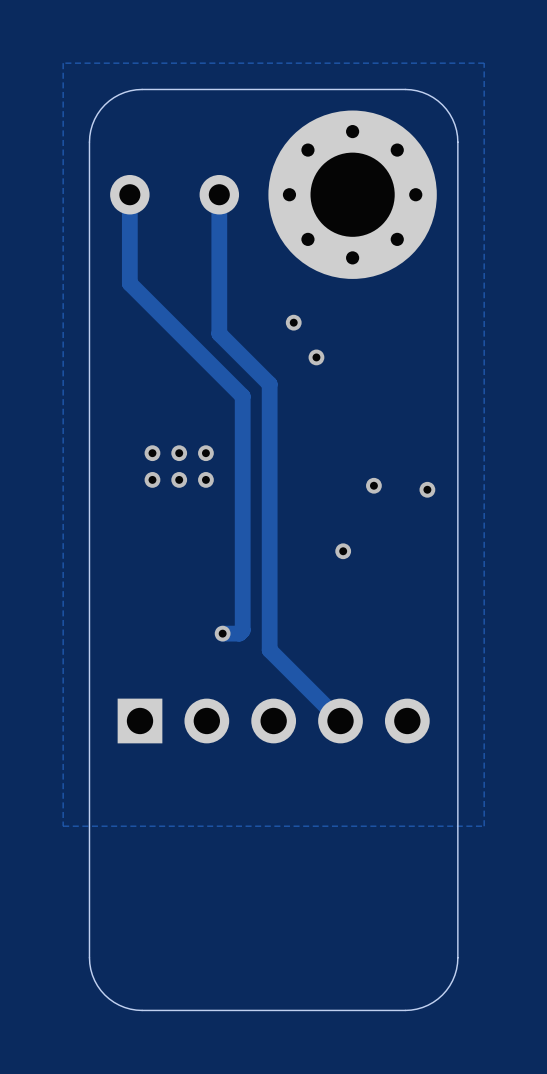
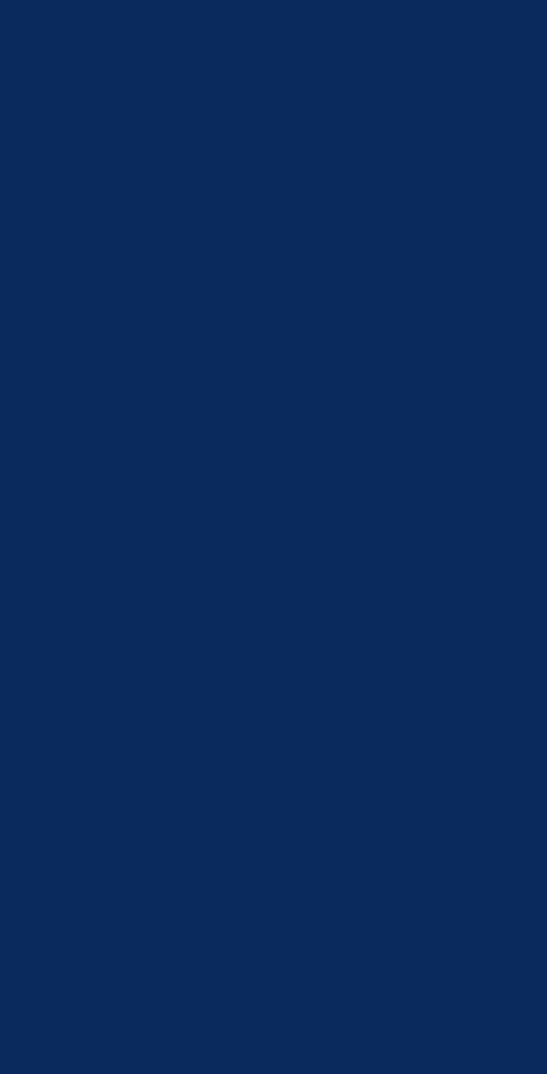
zone outline: (484, 63) (63, 63) (63, 826) (484, 826) (484, 63) -> none
board edge: (405, 89) (136, 89) (119, 94) (109, 100) (100, 109) (92, 124) (89, 142) (89, 957) (92, 975) (100, 990) (109, 998) (124, 1007) (142, 1010) (411, 1010) (422, 1007) (438, 998) (446, 990) (454, 975) (457, 957) (457, 142) (454, 124) (442, 104) (422, 92) (405, 89) -> none
track: (129, 194) (129, 283) (242, 396) (242, 630) (239, 633) (222, 633) -> none
part: (174, 194) -> none
track: (219, 194) (219, 333) (269, 384) (269, 650) (340, 720) -> none
part: (352, 194) -> none
via: (293, 322) -> none
via: (316, 357) -> none
via: (152, 453) -> none
via: (179, 453) -> none
via: (205, 453) -> none
via: (152, 479) -> none
via: (179, 479) -> none
via: (205, 479) -> none
via: (373, 485) -> none
via: (427, 489) -> none
via: (343, 551) -> none
via: (222, 633) -> none
part: (273, 720) -> none

